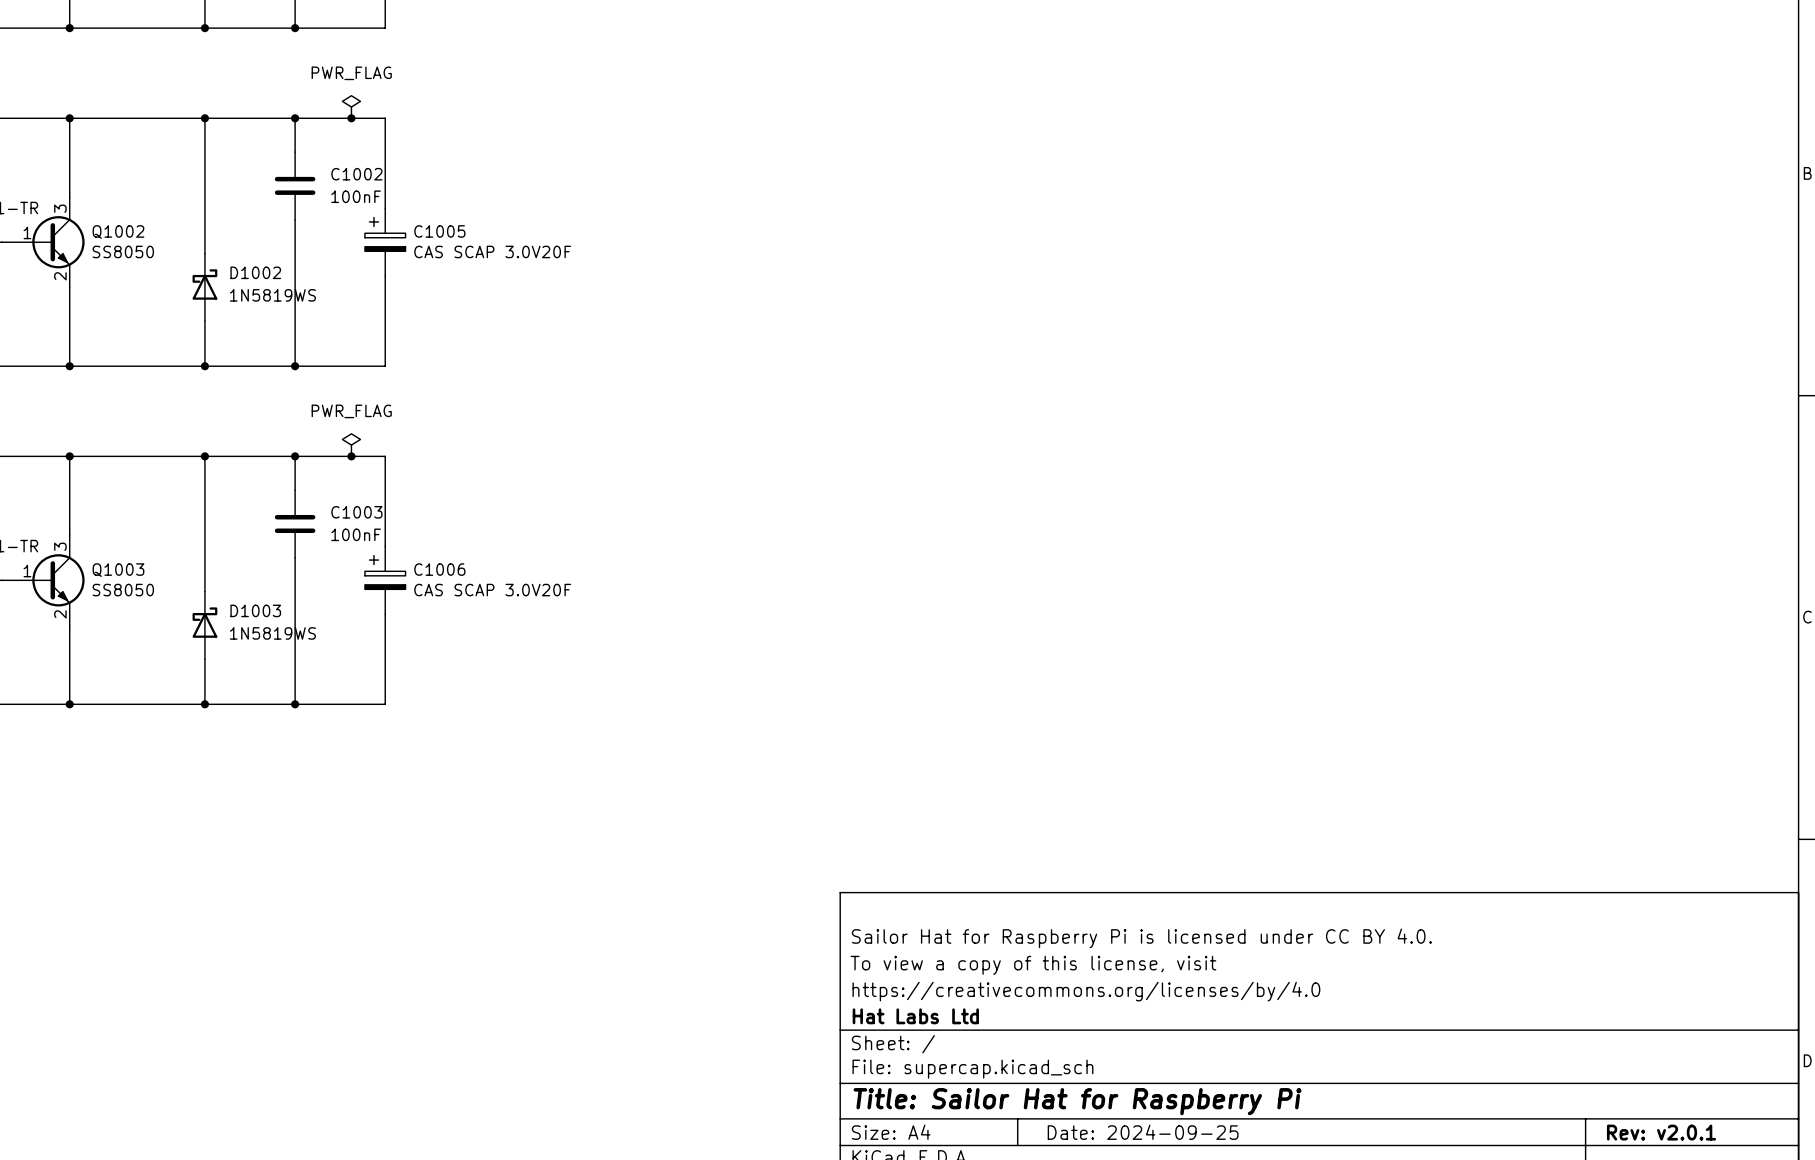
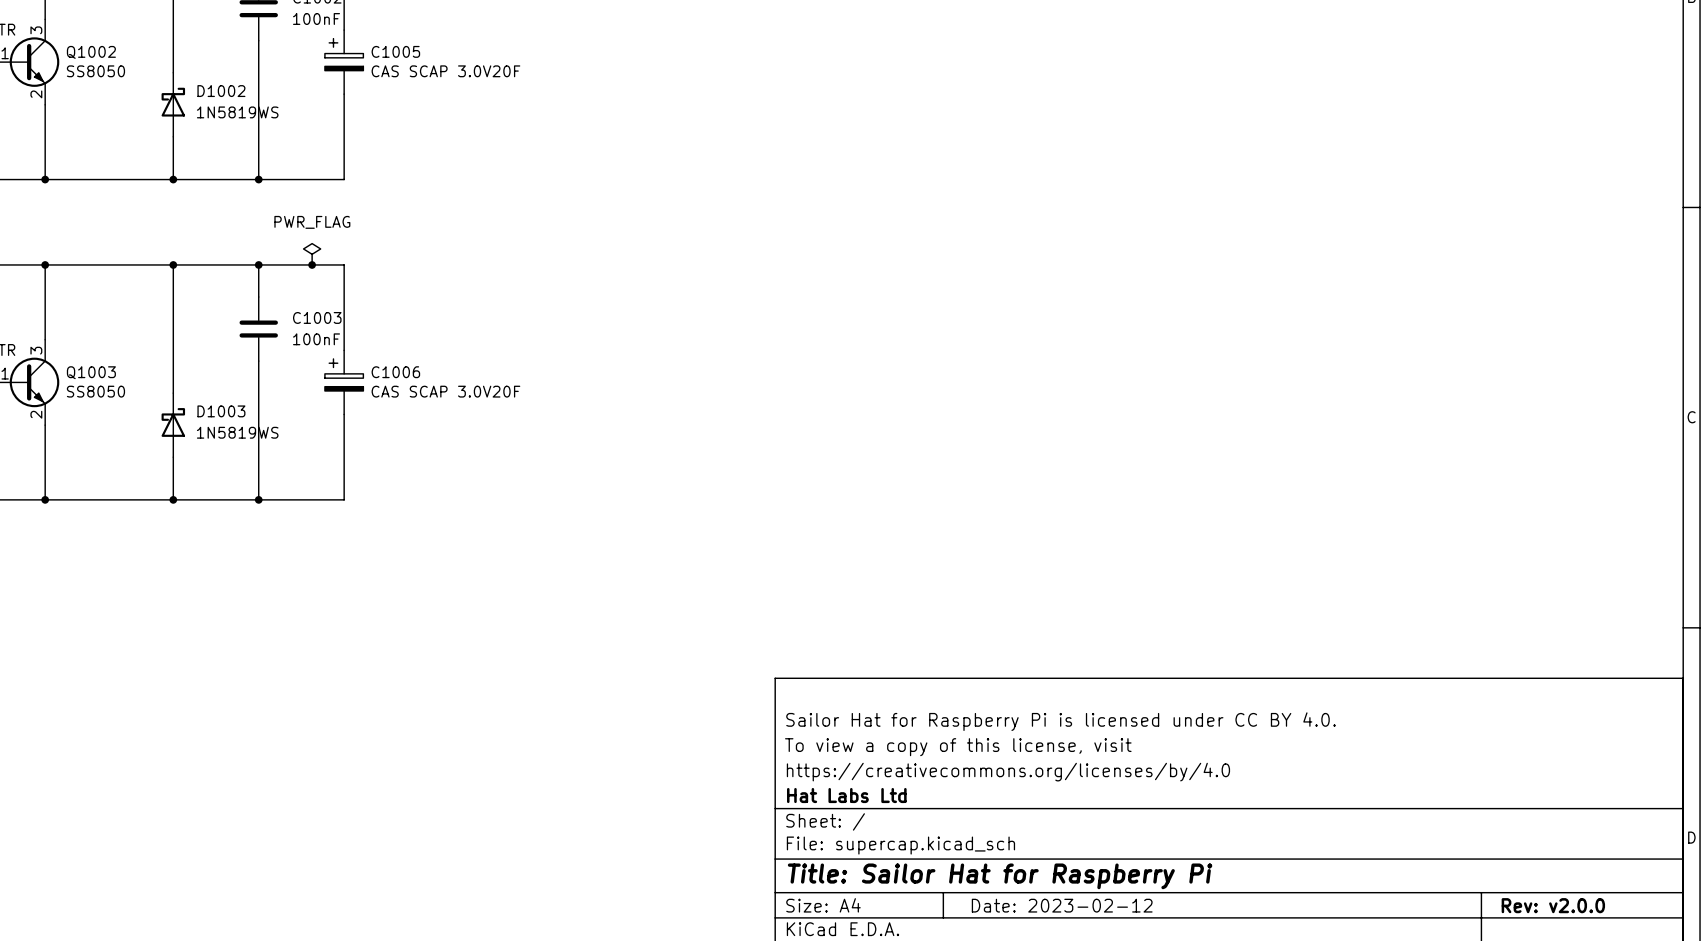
title block: Date: 2024-09-25 (1143, 1132) -> Date: 2023-02-12 (1062, 905)
title block: Rev: v2.0.1 (1661, 1132) -> Rev: v2.0.0 (1553, 905)

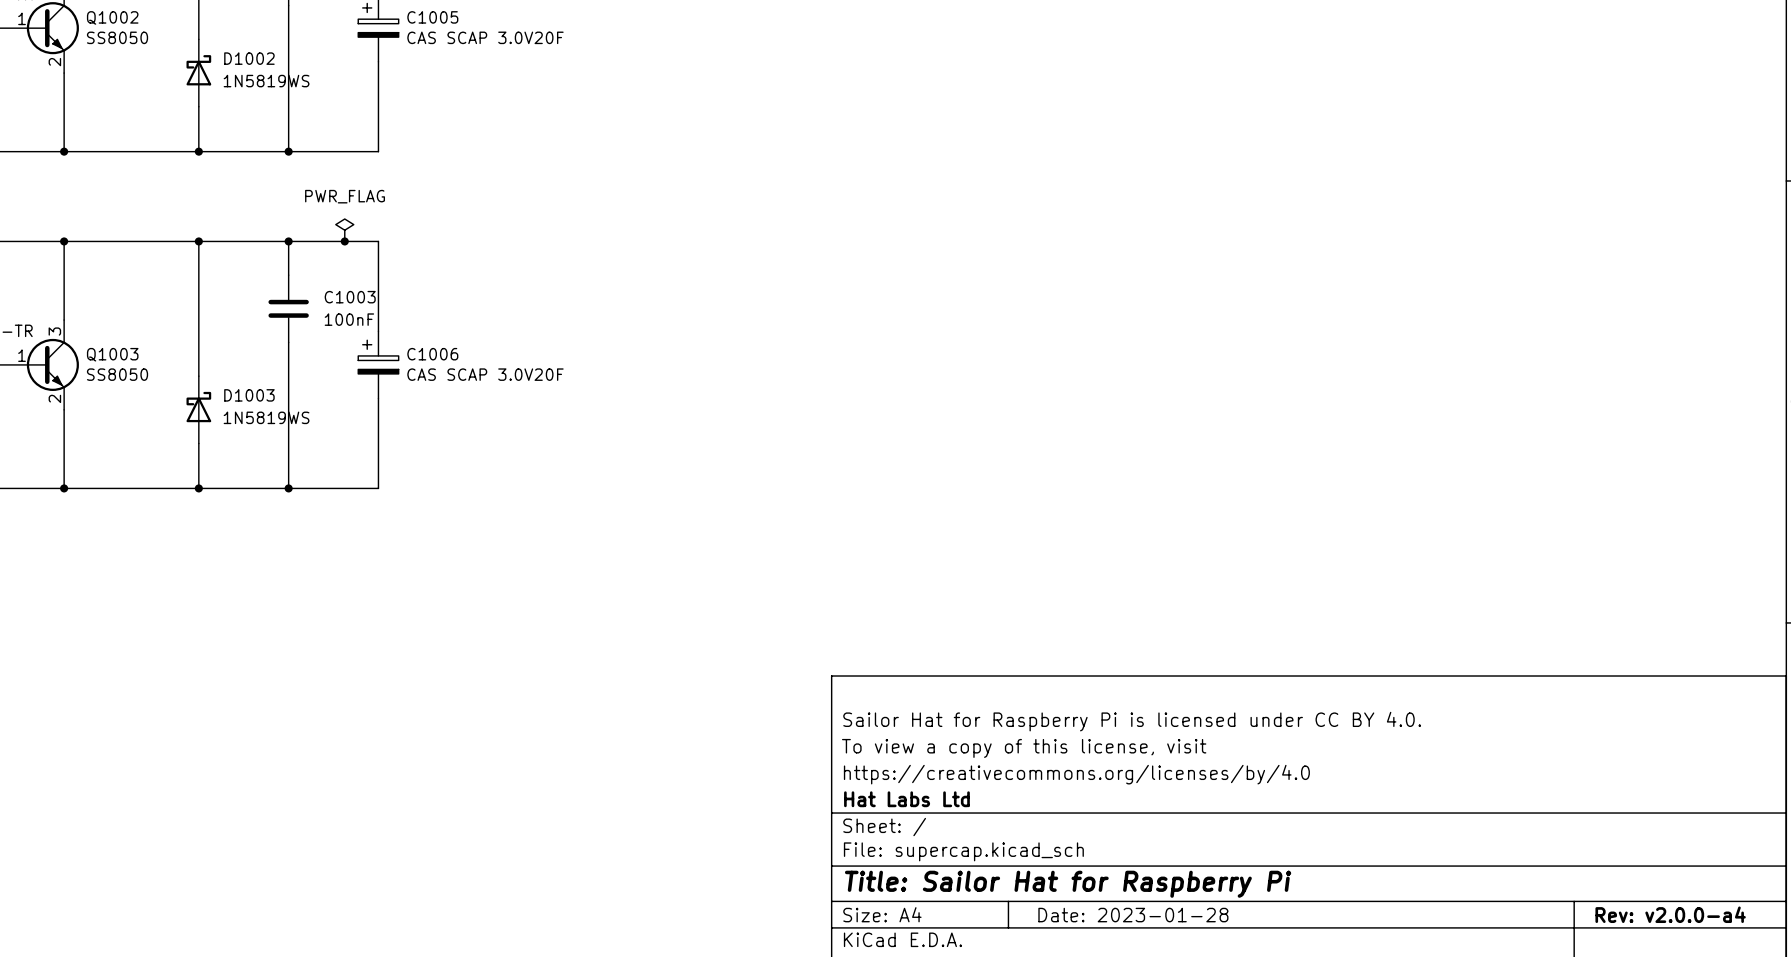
title block: Date: 2023-02-12 (1062, 905) -> Date: 2023-01-28 (1133, 915)
title block: Rev: v2.0.0 (1553, 905) -> Rev: v2.0.0-a4 (1670, 914)

